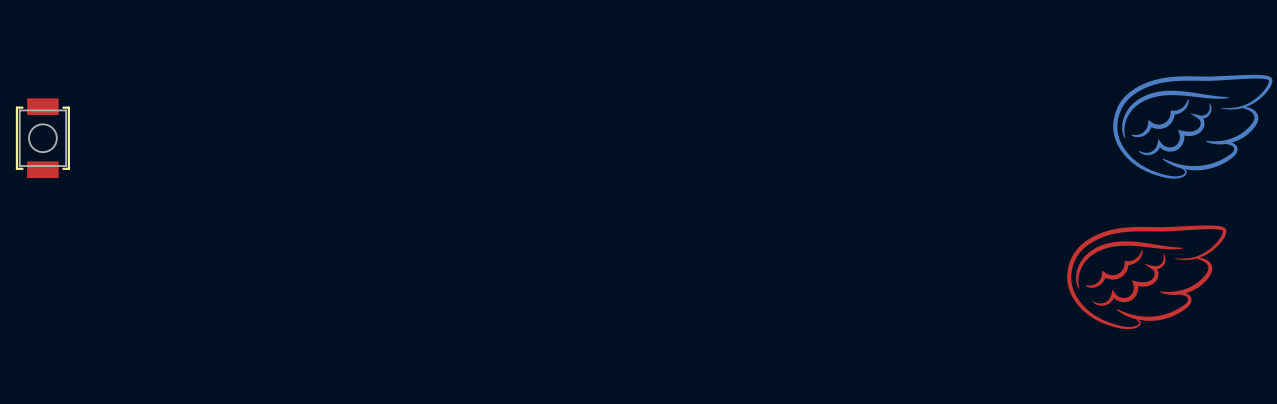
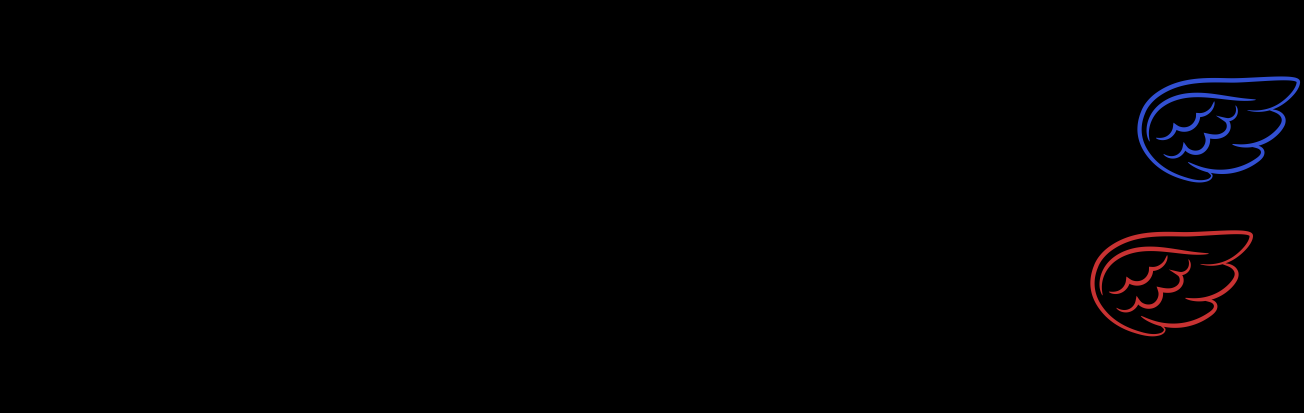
part: (42, 138) -> none

